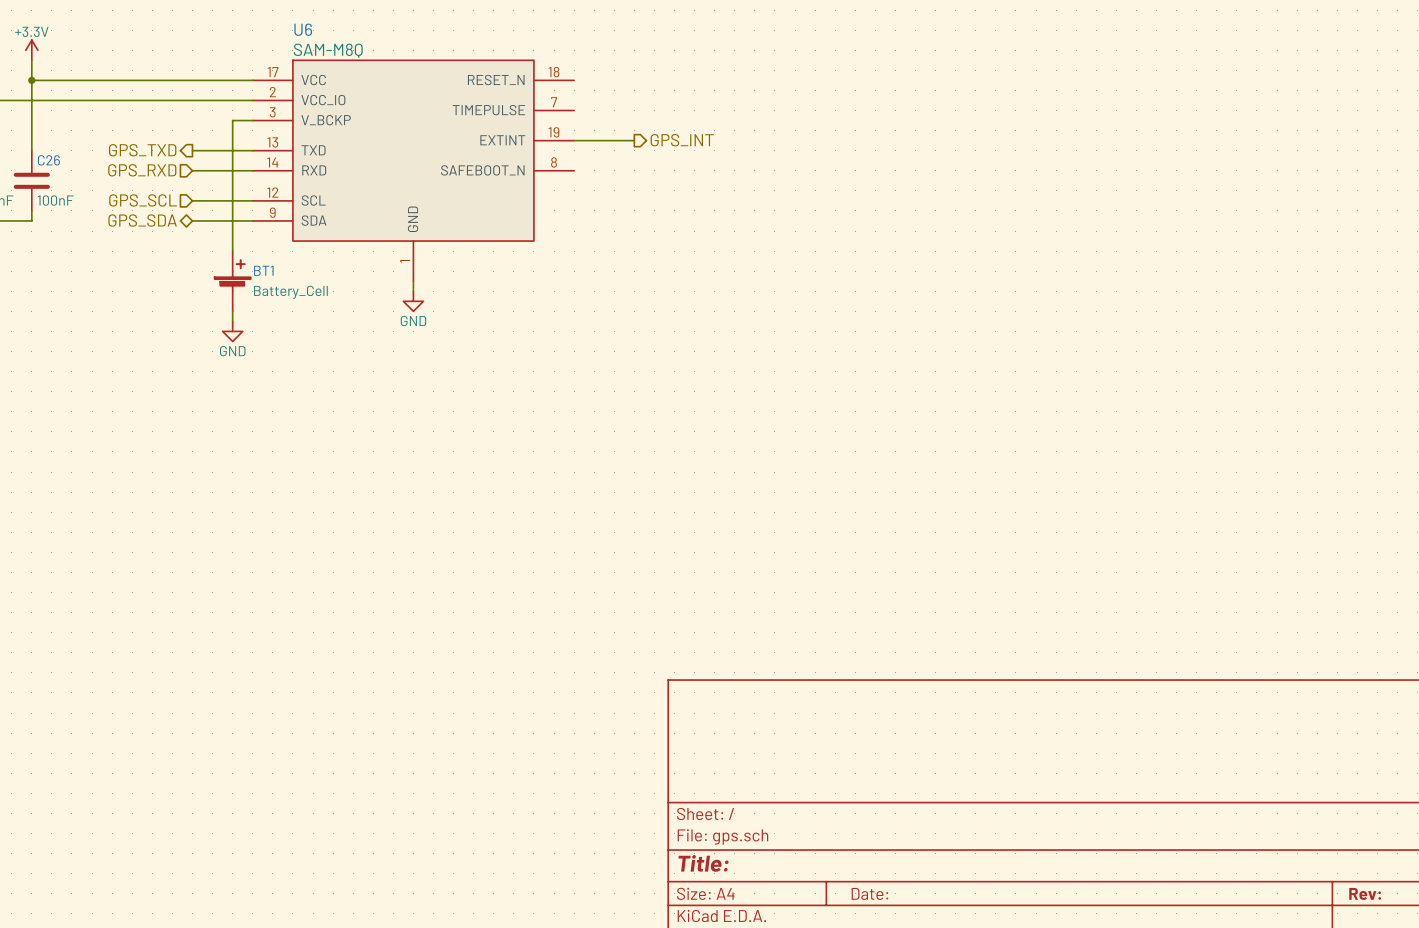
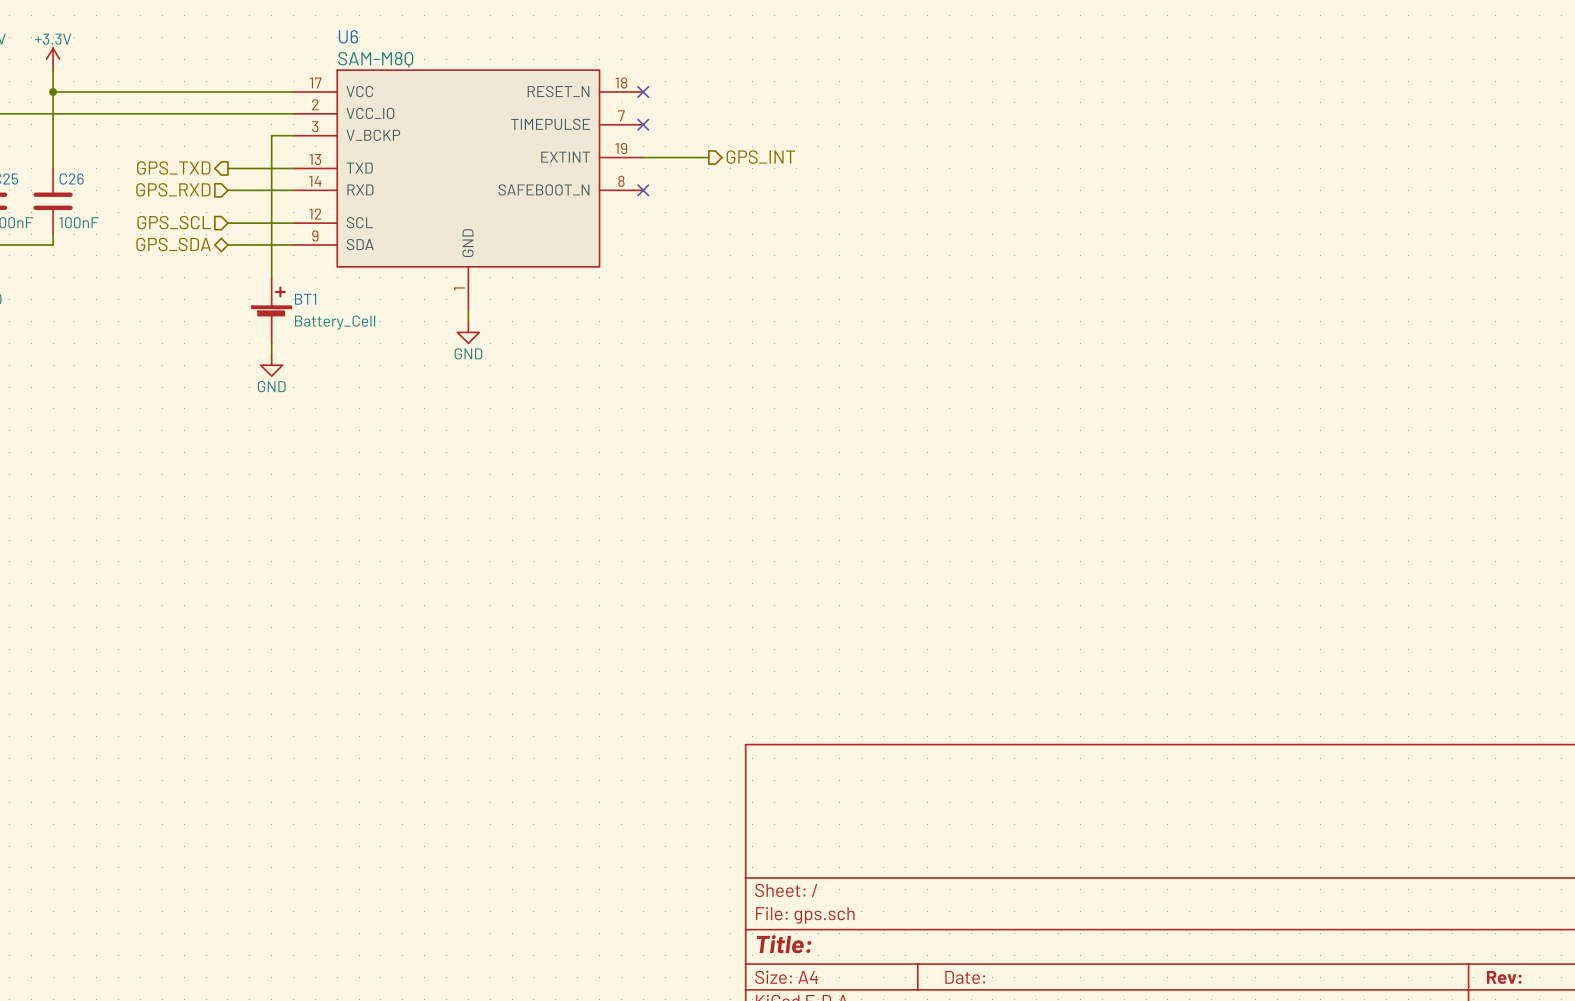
no-connect mark: none -> (643, 91)
no-connect mark: none -> (643, 124)
no-connect mark: none -> (643, 190)

